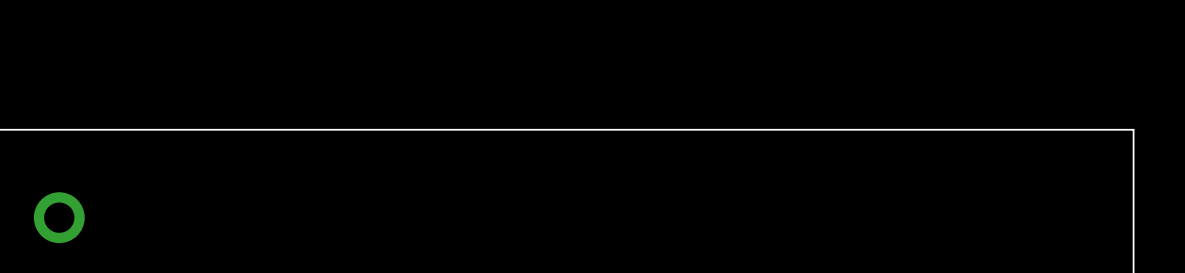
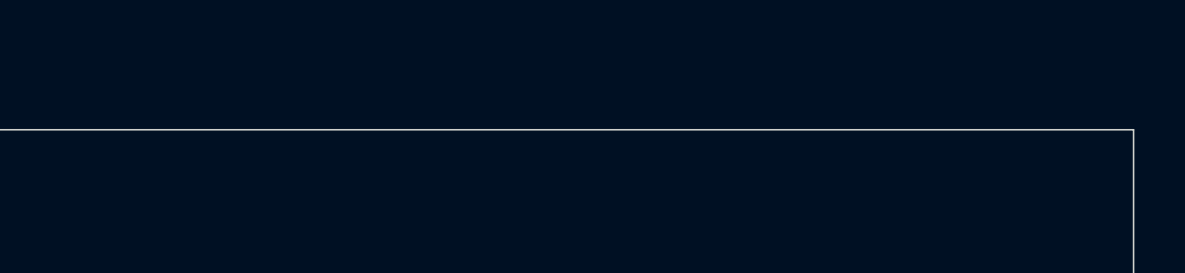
via: (59, 217) -> none

